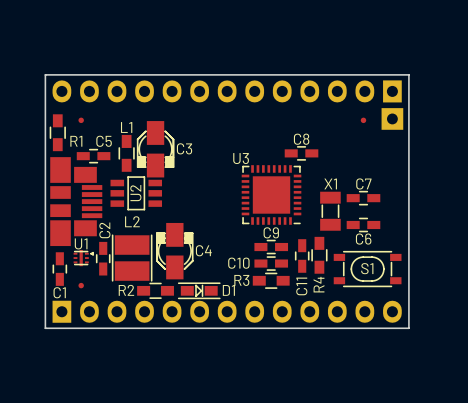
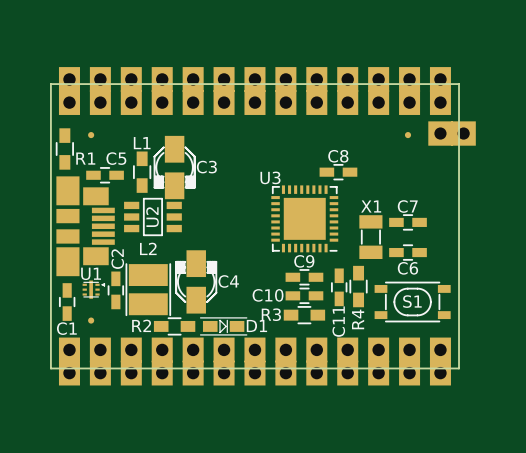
part footprint: [52, 80, 402, 103] -> [58, 67, 451, 115]
part footprint: [381, 108, 404, 130] -> [428, 121, 476, 146]
part footprint: [52, 300, 402, 323] -> [58, 337, 451, 386]

